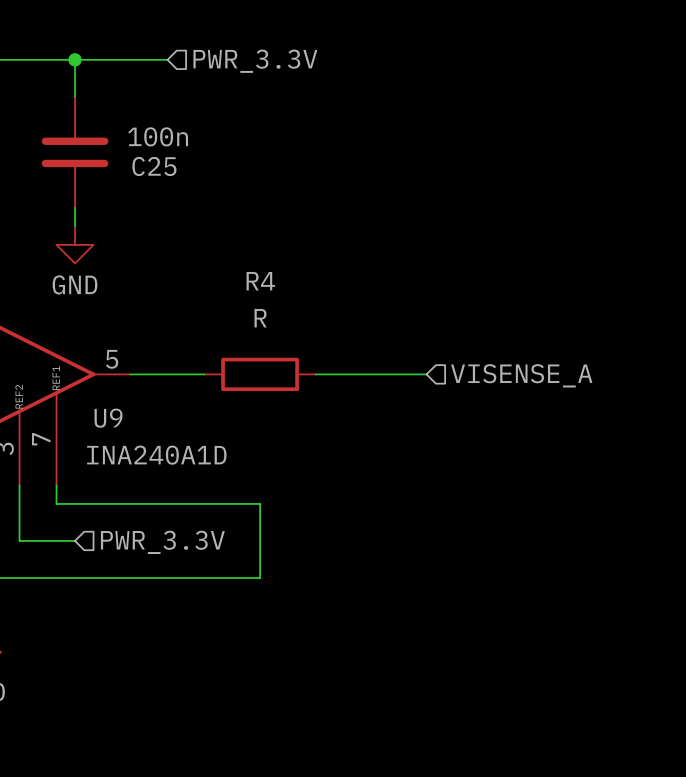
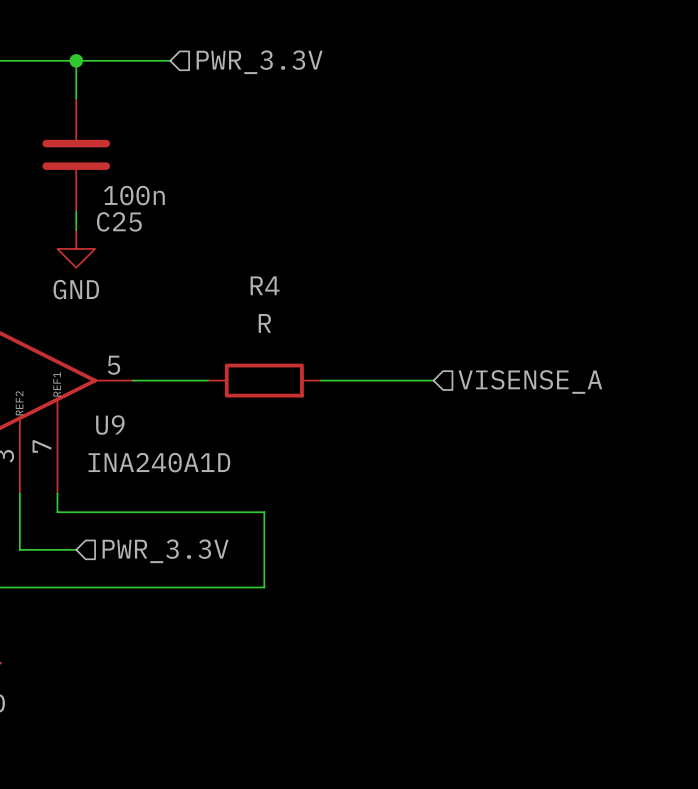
C25 value position: 100n (158, 136) -> 100n (134, 195)
C25 name position: C25 (154, 166) -> C25 (119, 221)

